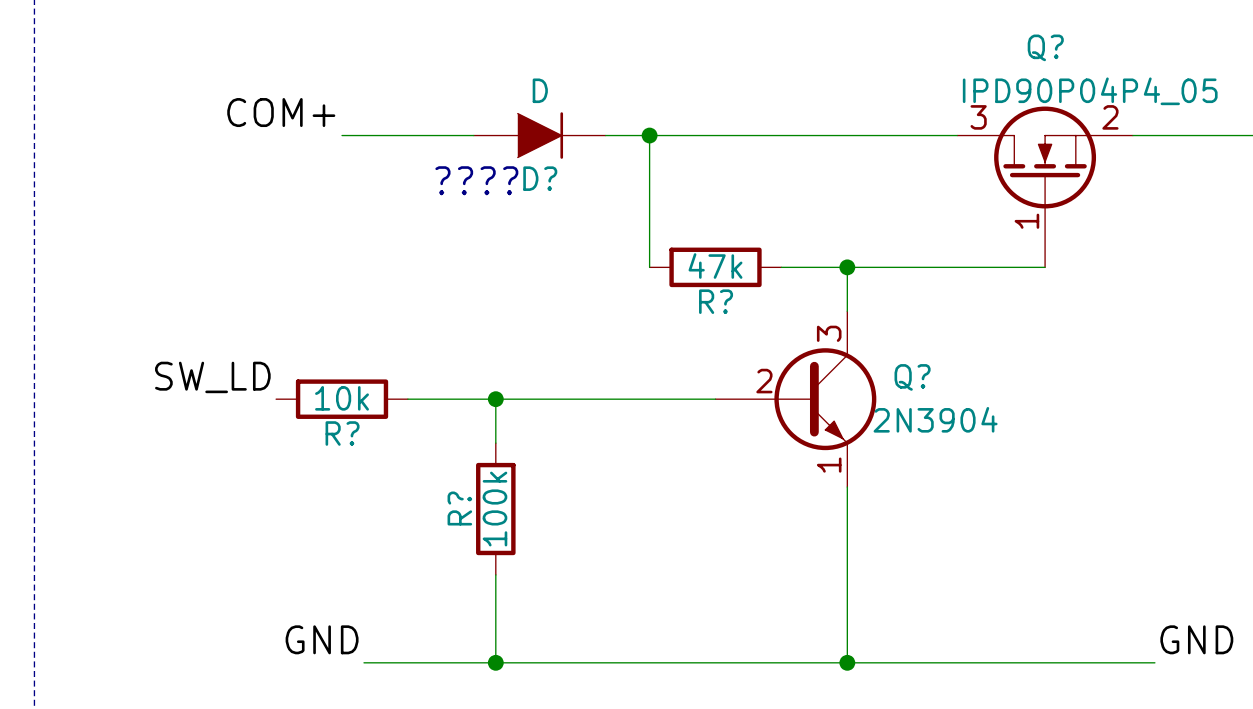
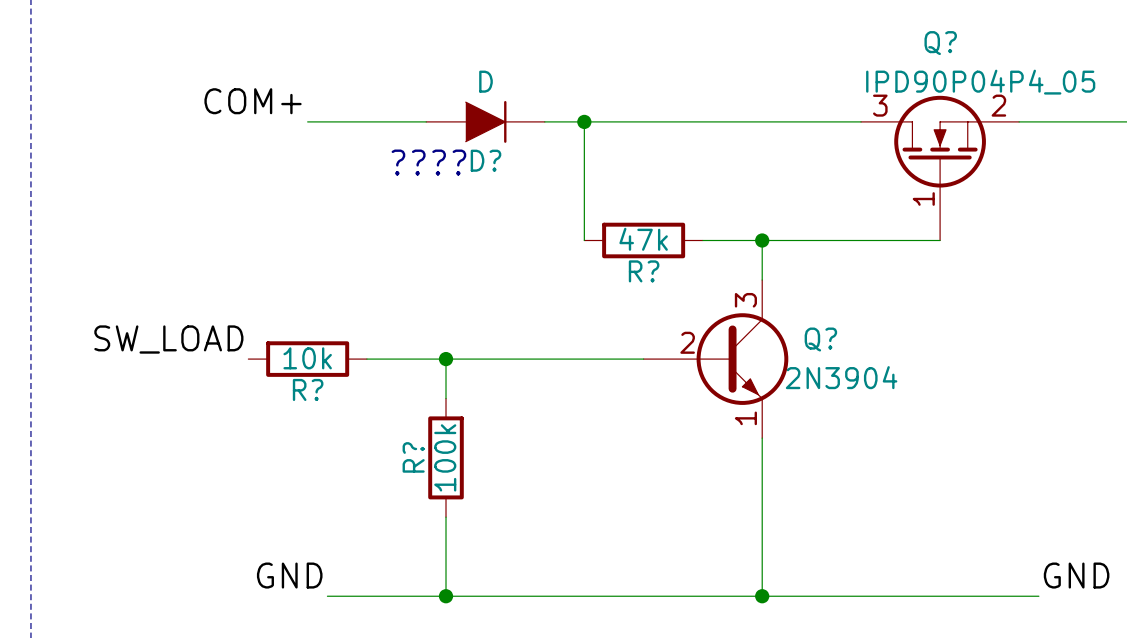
label: SW_LD (212, 377) -> SW_LOAD (168, 339)

